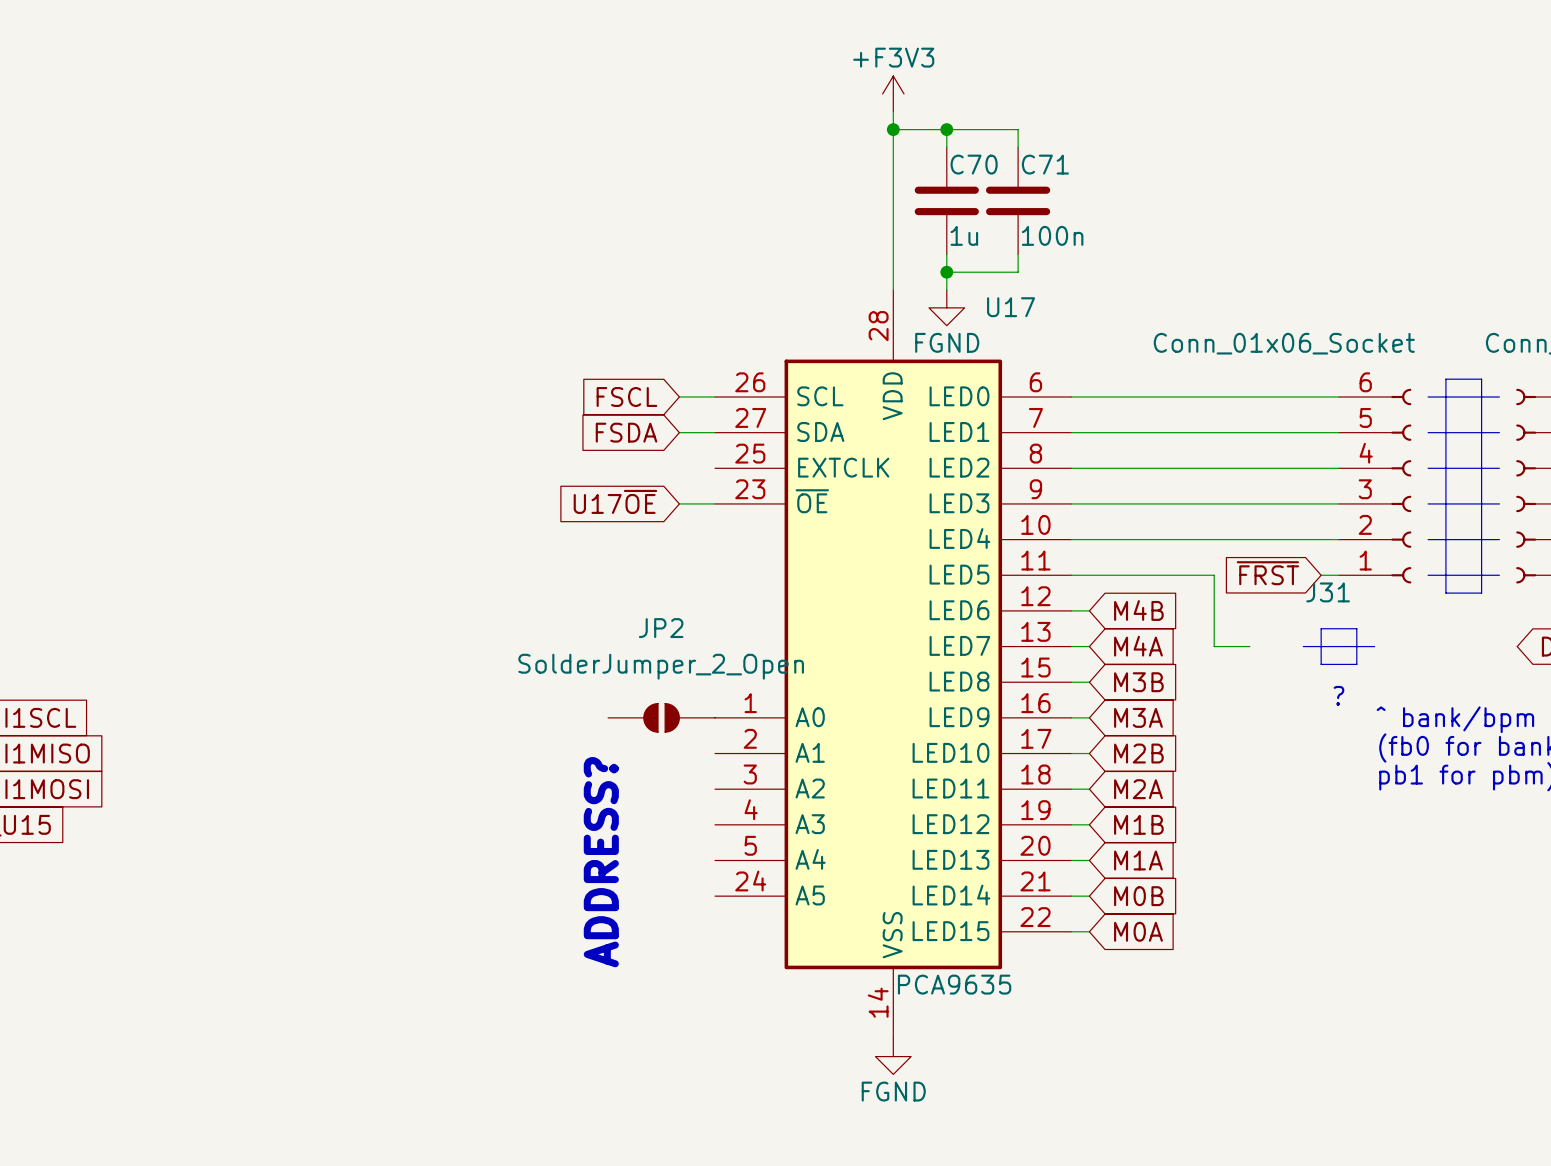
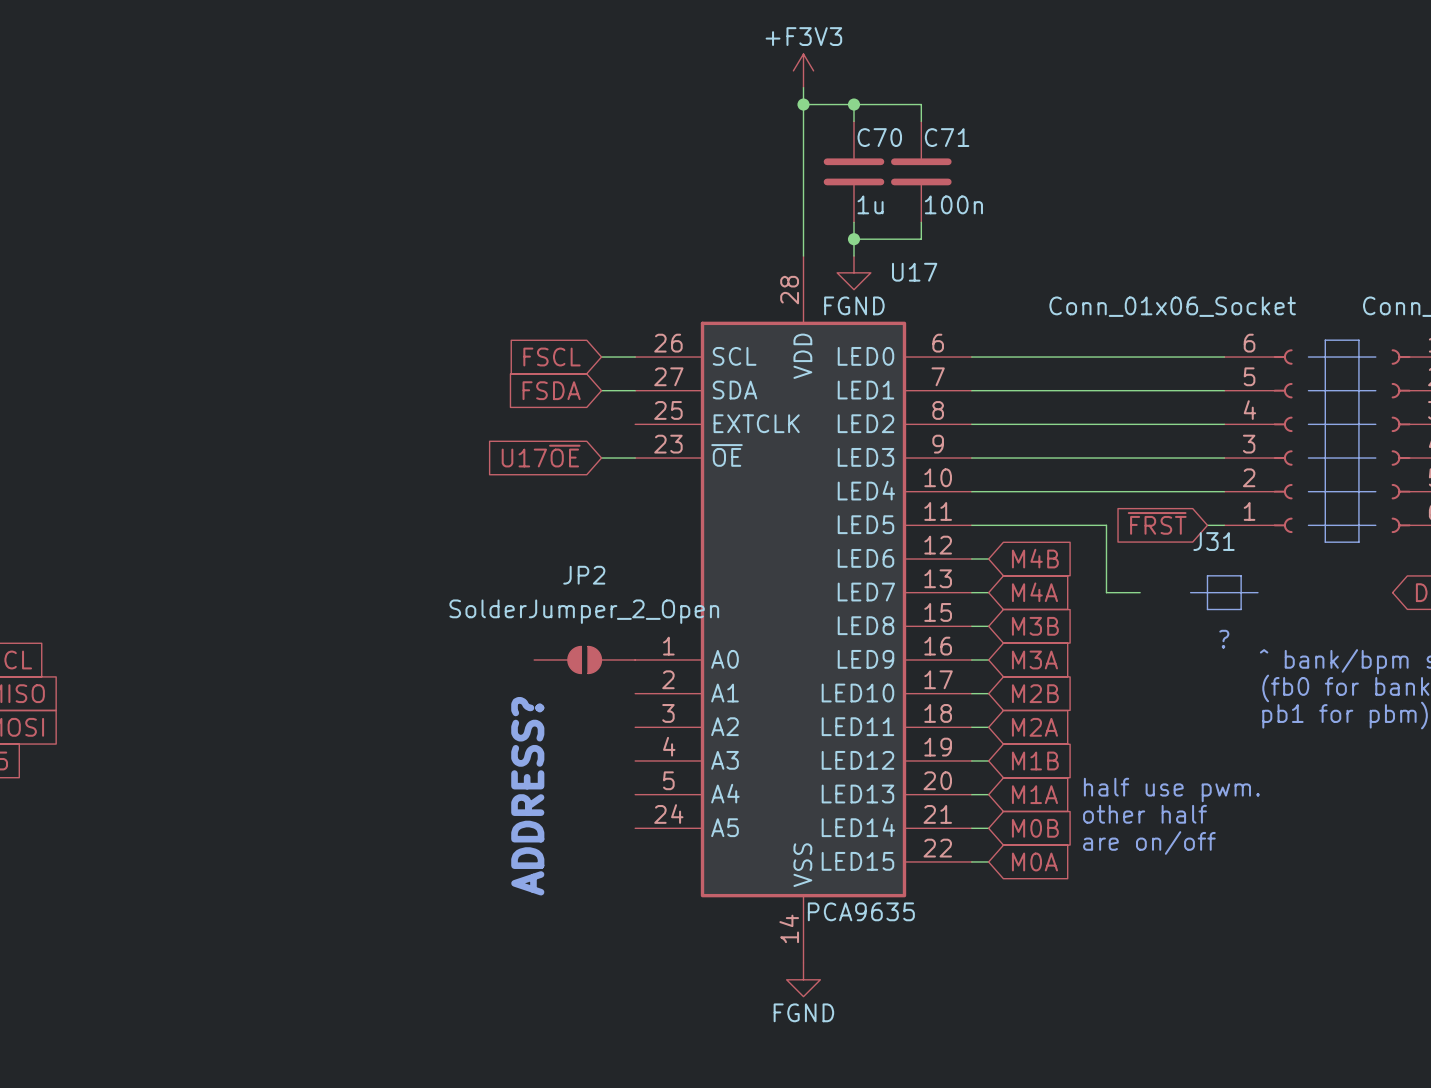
text: none -> half use pwm. (1171, 789)
text: none -> other half (1144, 814)
text: none -> are on/off (1149, 842)

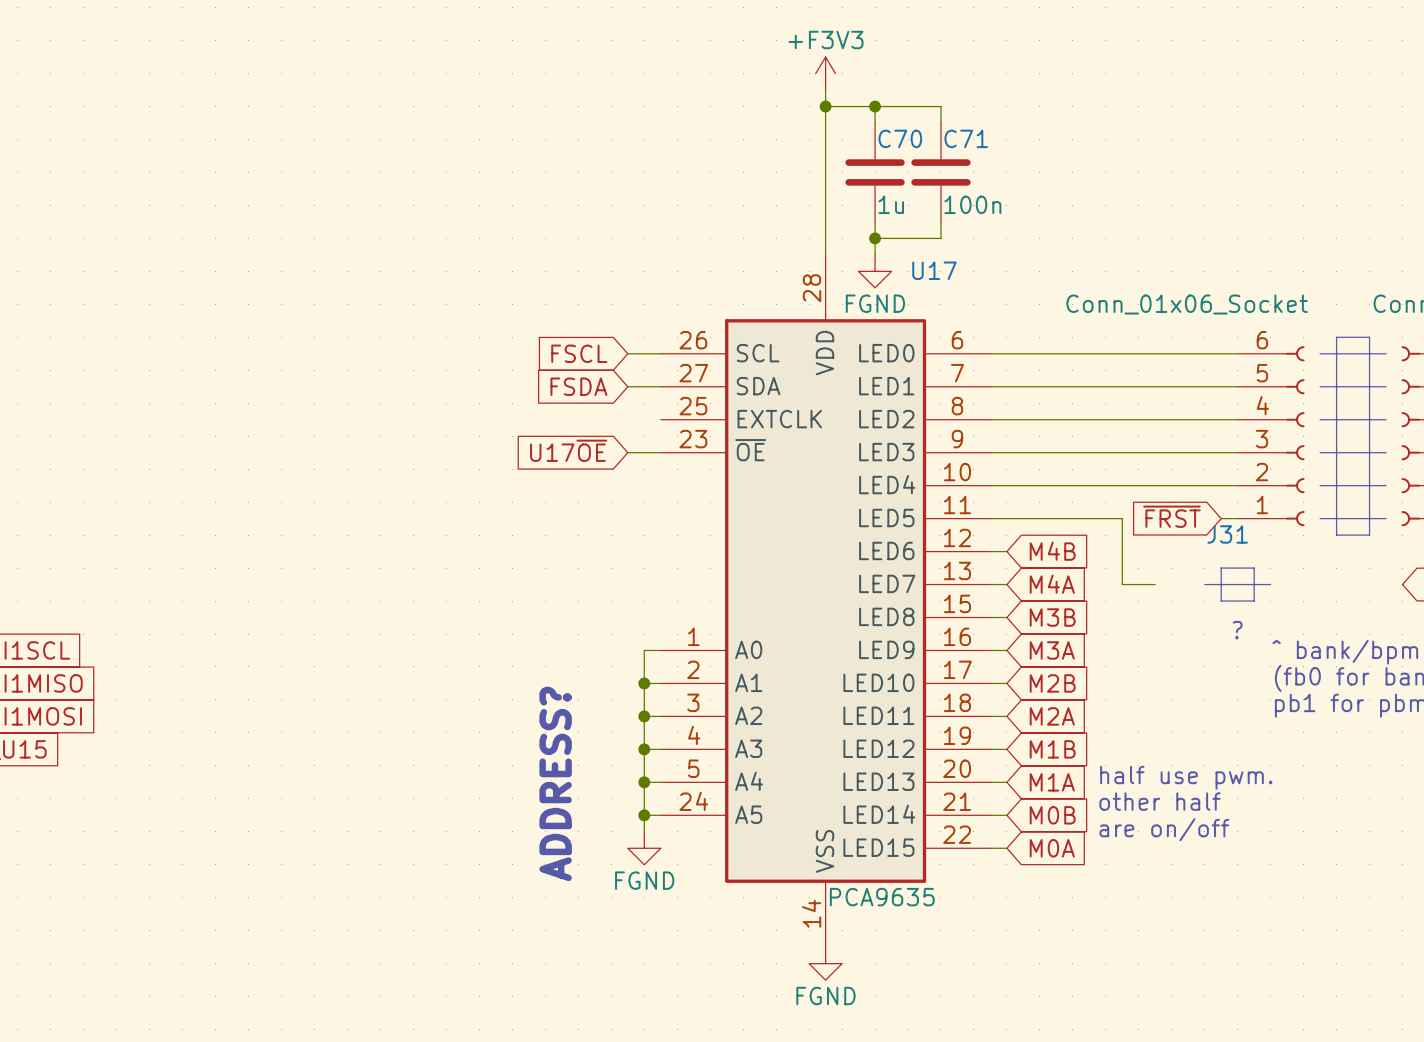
JP2: SolderJumper_2_Open (584, 659) -> none
wire: none -> (660, 650) (644, 650) (644, 831)
wire: none -> (644, 683) (660, 683)
junction: none -> (644, 683)
wire: none -> (644, 716) (660, 716)
junction: none -> (644, 716)
wire: none -> (644, 749) (660, 749)
junction: none -> (644, 749)
wire: none -> (644, 782) (660, 782)
junction: none -> (644, 782)
wire: none -> (644, 815) (660, 815)
junction: none -> (644, 815)
power symbol: none -> FGND (644, 848)

